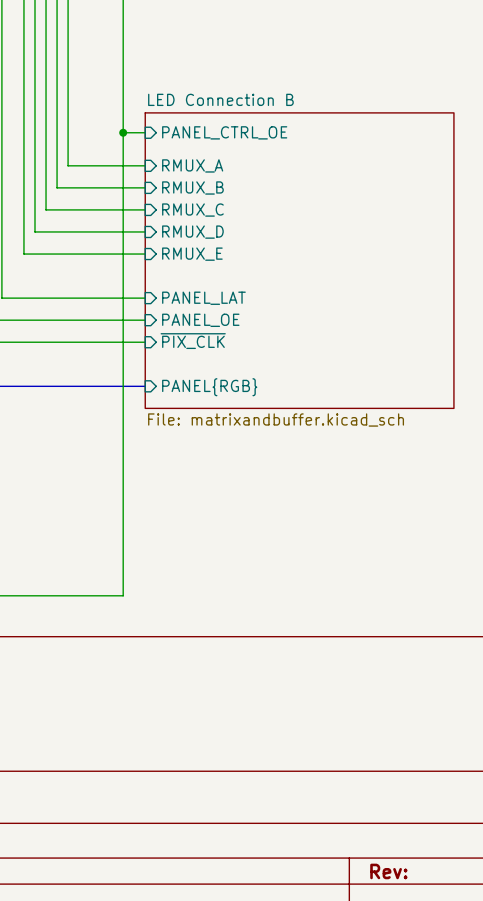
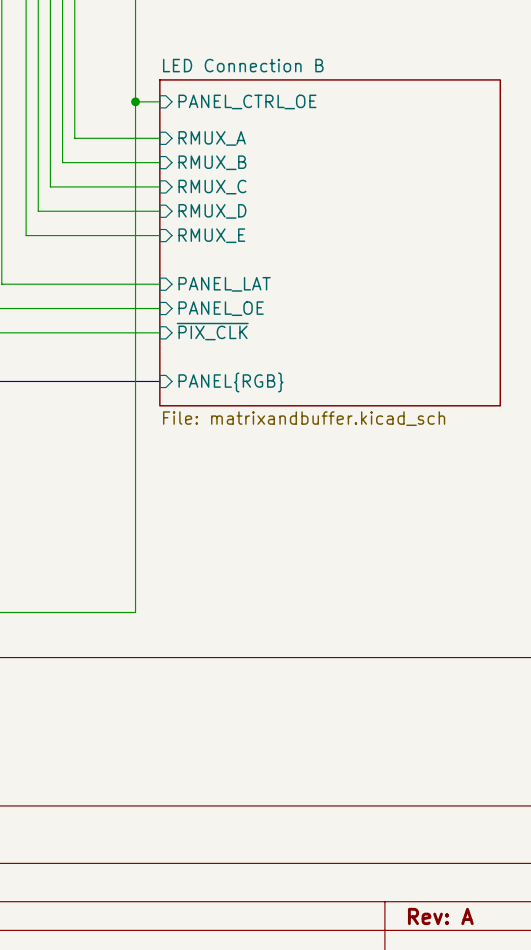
title block: Rev: (388, 871) -> Rev: A (440, 916)

